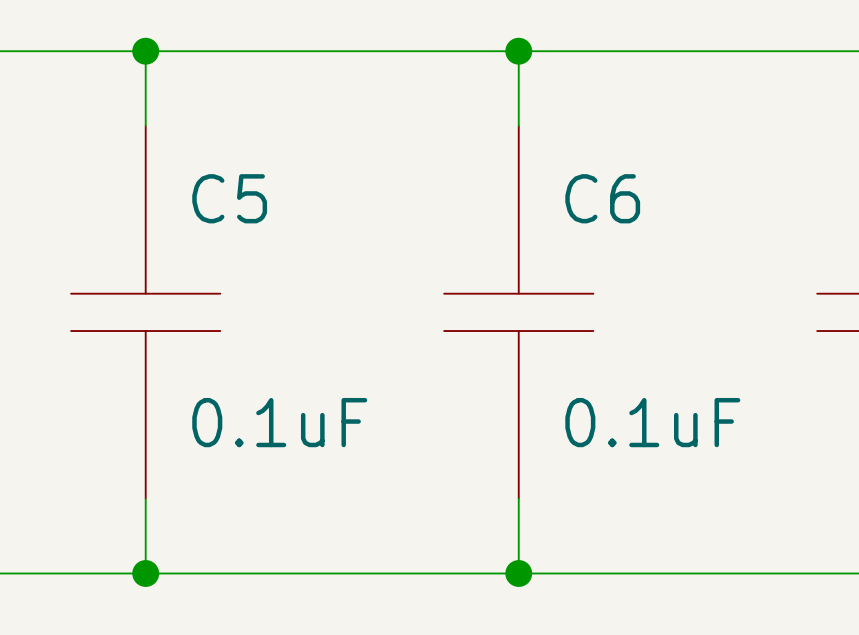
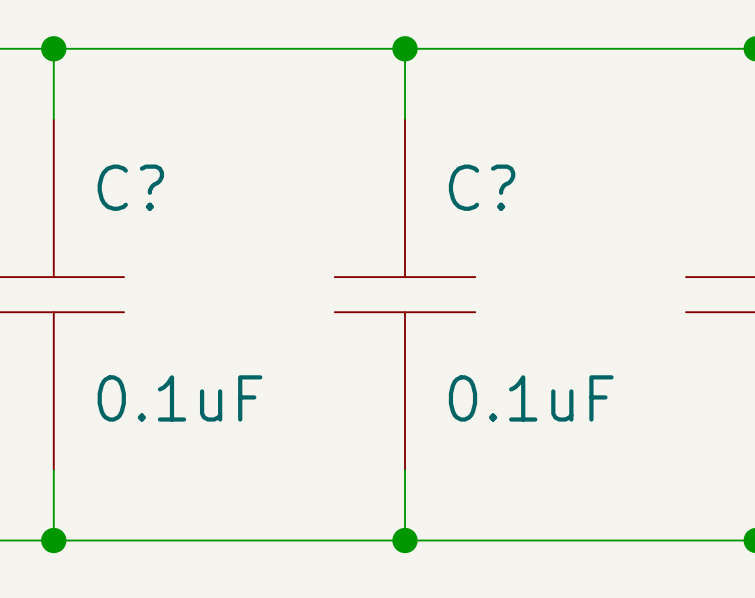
C5 name: C5 (229, 198) -> C? (130, 187)
C6 name: C6 (602, 198) -> C? (482, 187)

